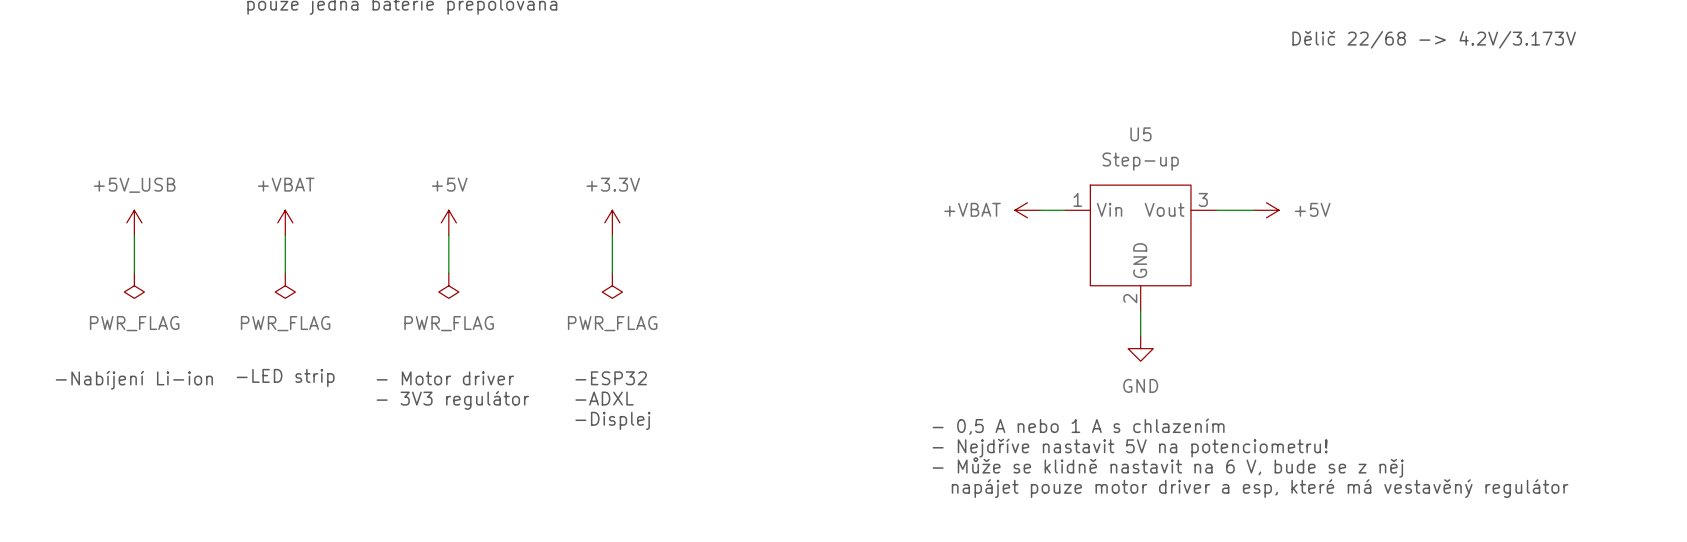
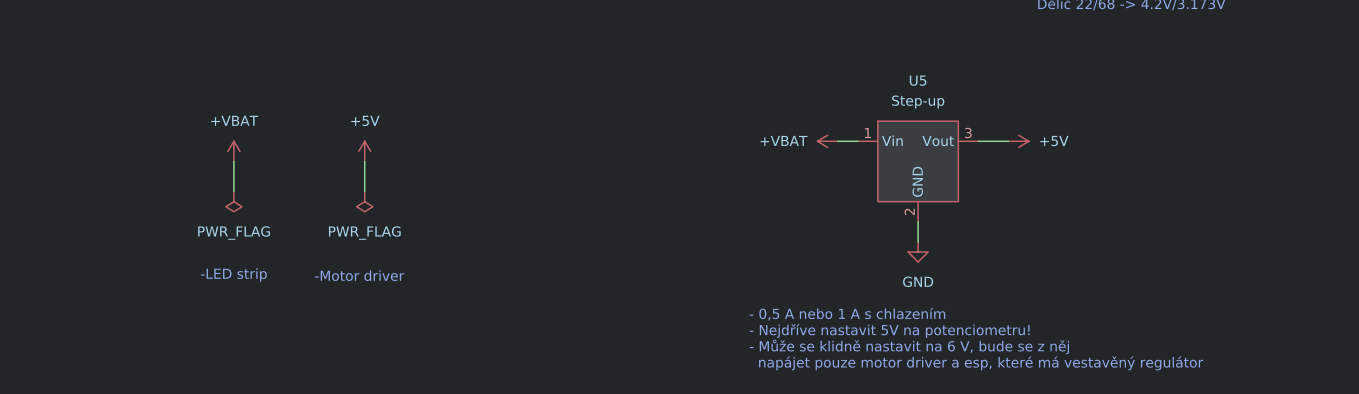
power symbol: +5V_USB (134, 222) -> none
power symbol: +3.3V (612, 222) -> none
wire: (134, 235) (134, 273) -> none
wire: (612, 235) (612, 273) -> none
power symbol: PWR_FLAG (134, 285) -> none
power symbol: PWR_FLAG (612, 285) -> none
text: - Motor driver (445, 378) -> -Motor driver (359, 275)
text: -ESP32 (611, 378) -> none
text: -Nabíjení Li-ion (134, 380) -> none
text: -ADXL (604, 398) -> none
text: - 3V3 regulátor (452, 400) -> none
text: -Displej (612, 420) -> none

